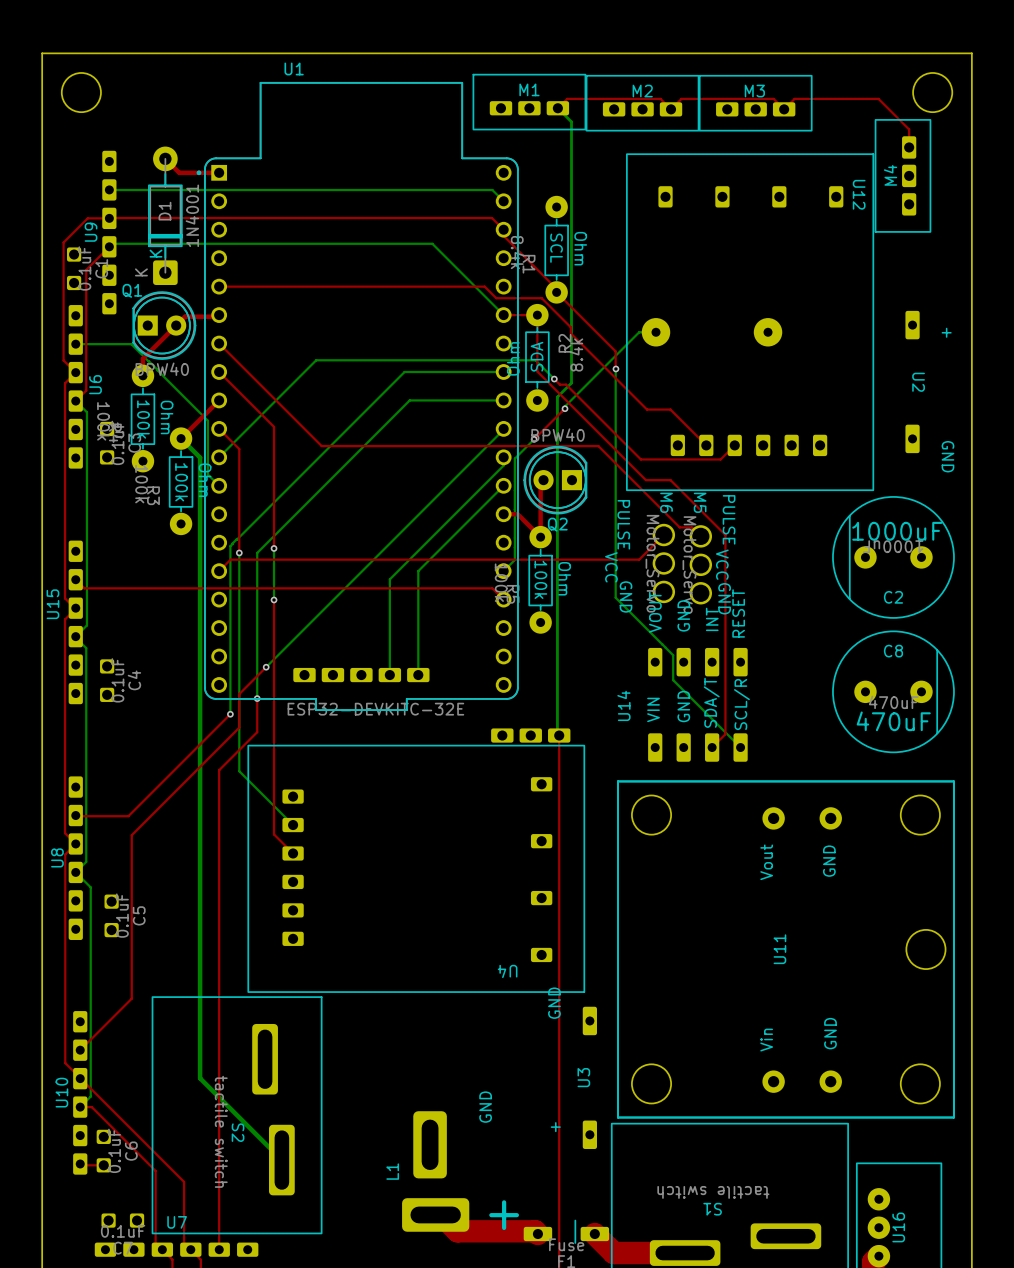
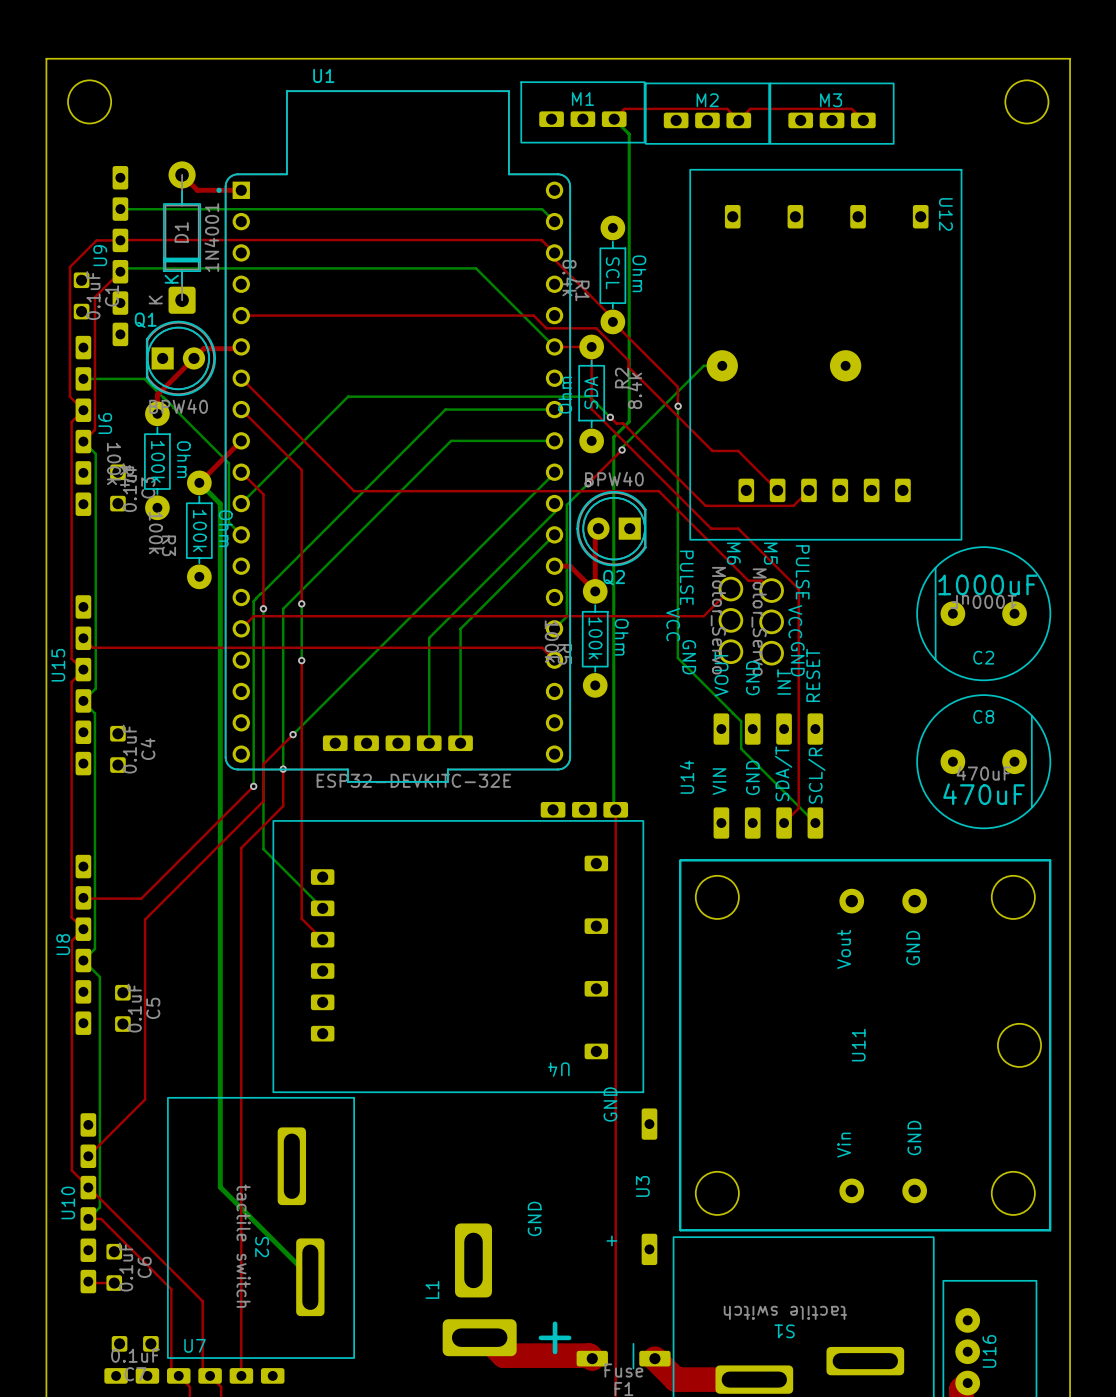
top track: (784, 109) (794, 98) (878, 98) (909, 129) (909, 147) -> none
M4: (903, 175) -> none
U2: (912, 381) -> none

